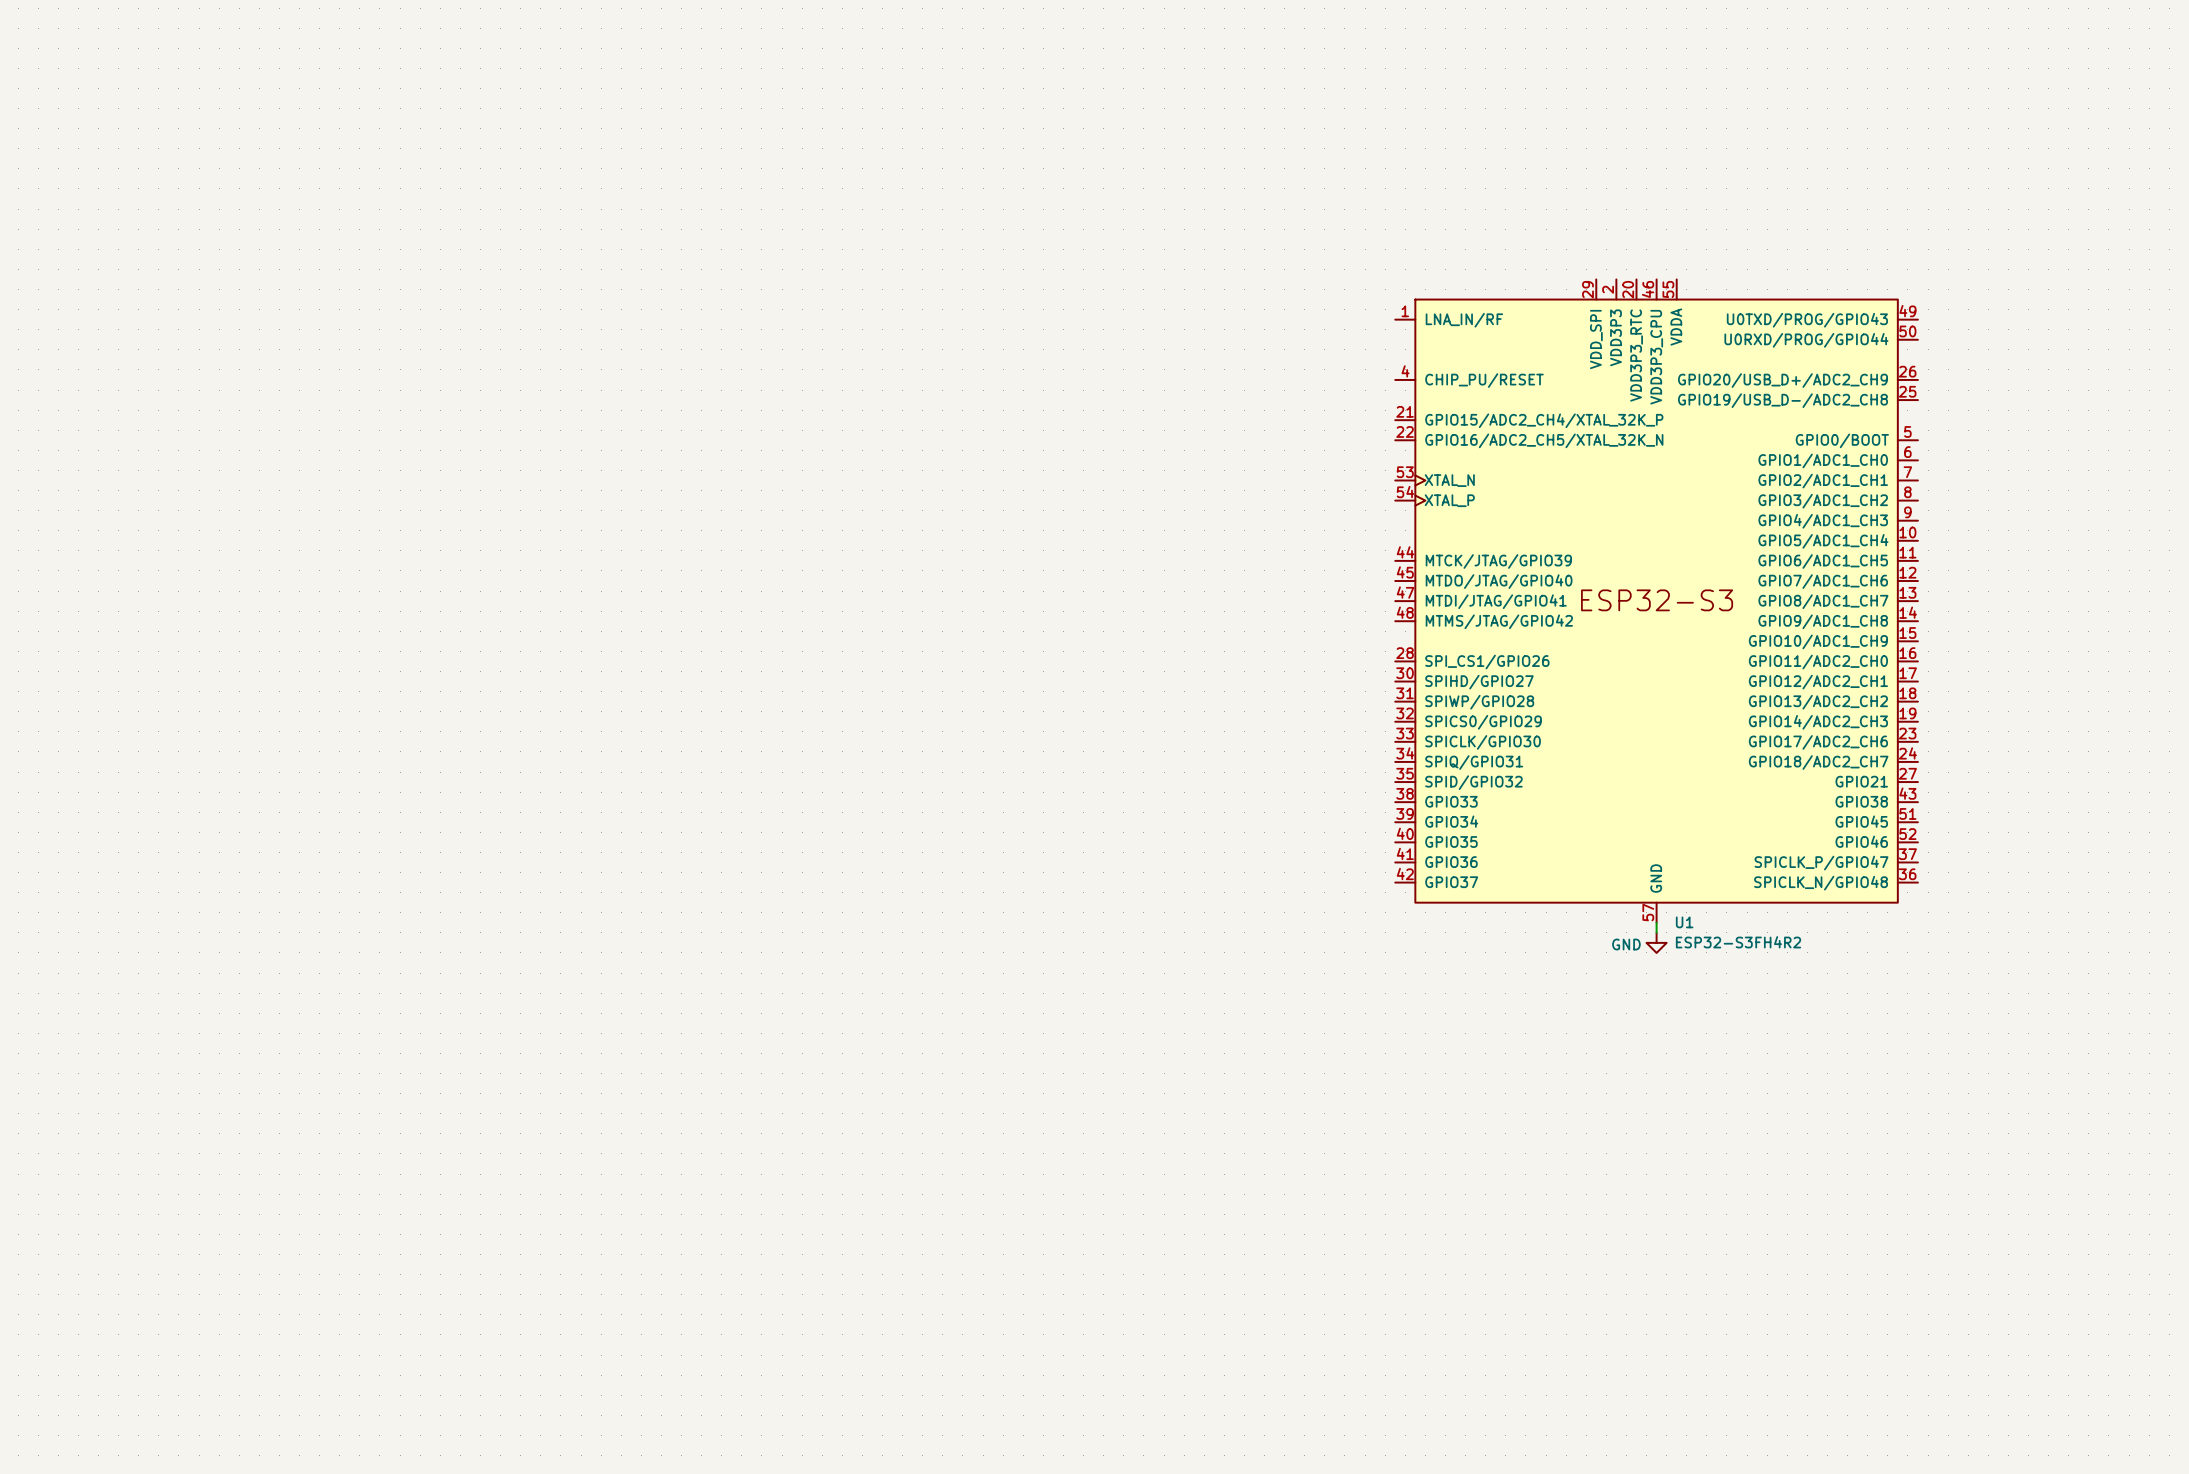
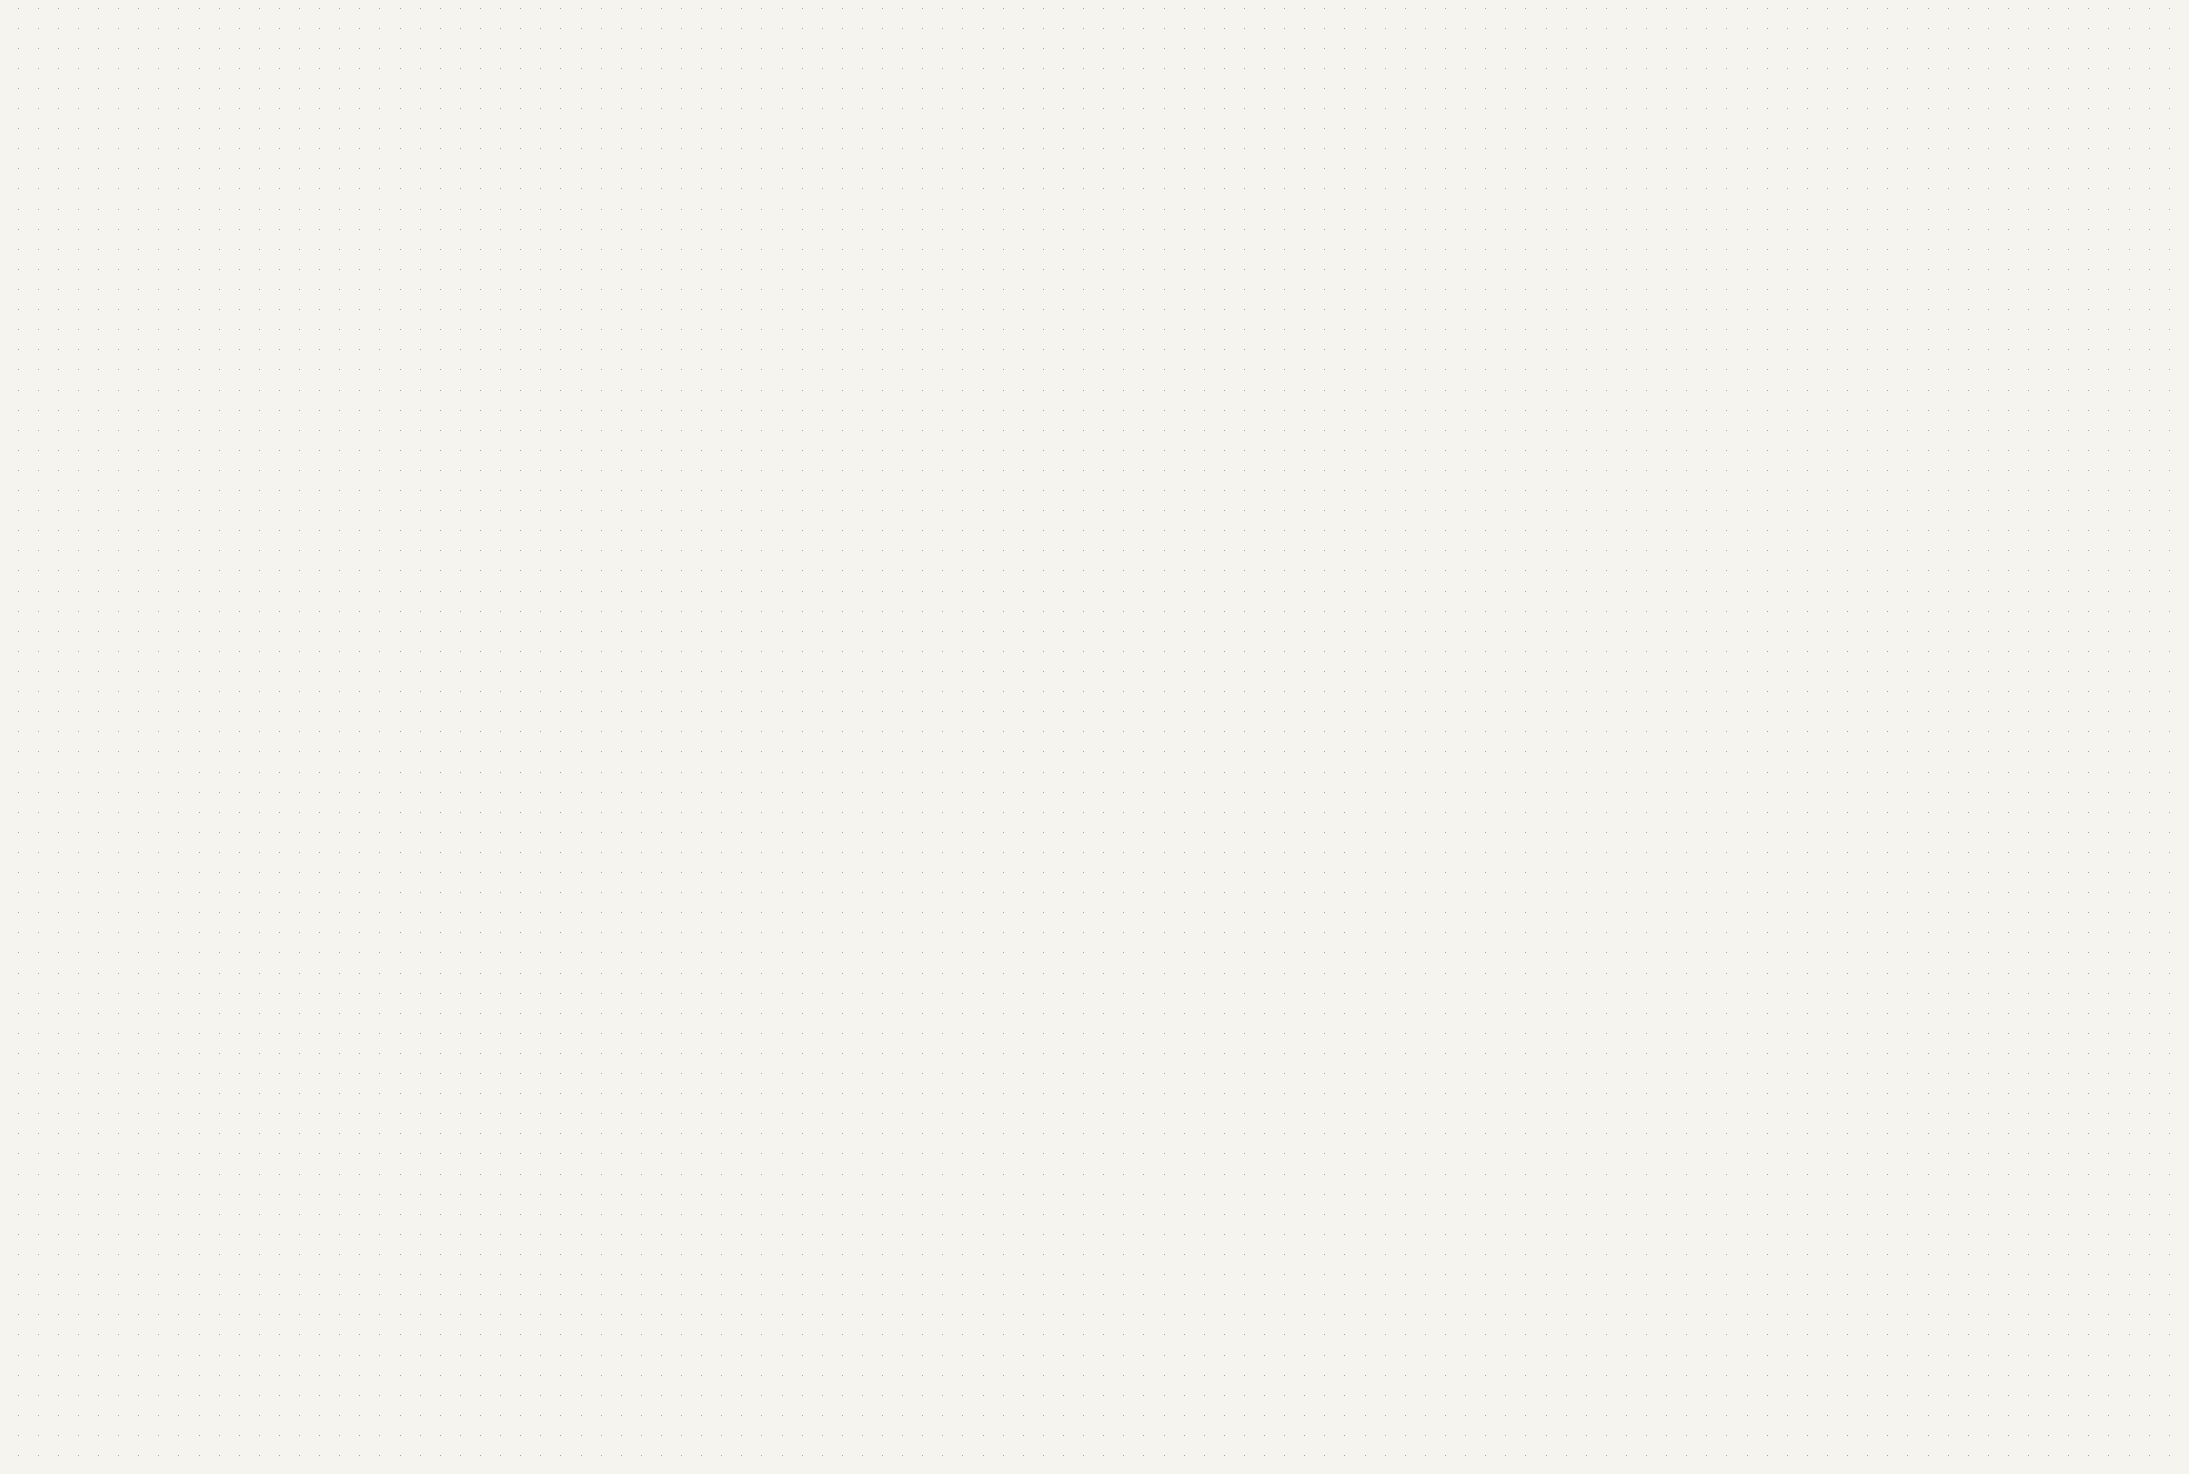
U1: ESP32-S3FH4R2 (1656, 601) -> none
wire: (1656, 922) (1656, 932) -> none
power symbol: GND (1656, 942) -> none

